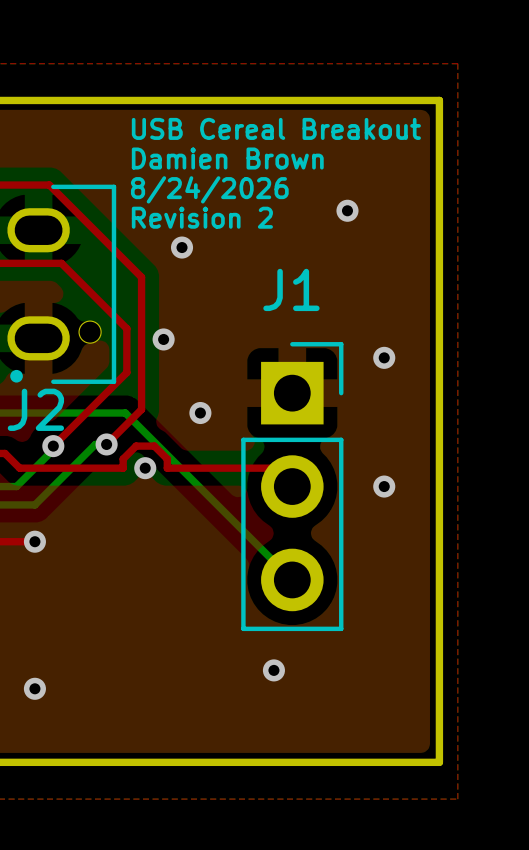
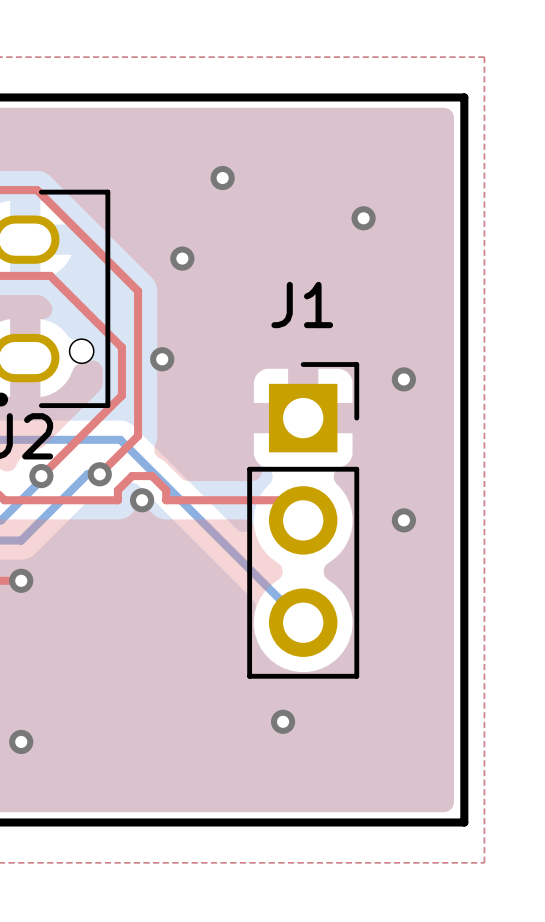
text: USB Cereal Breakout (276, 128) -> none
text: Damien Brown (227, 158) -> none
via: none -> (222, 178)
text: 8/24/2026 (209, 189) -> none
text: Revision 2 (202, 217) -> none
via: (200, 413) -> none

